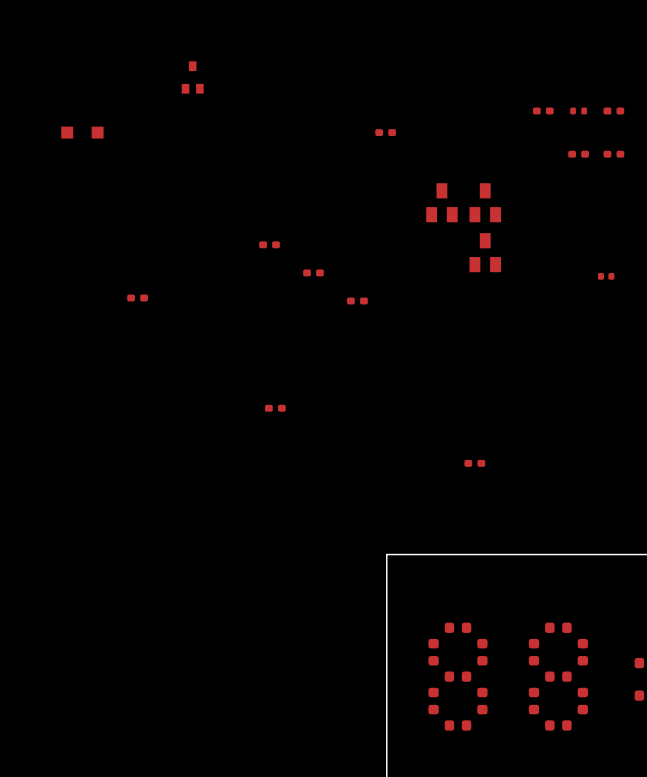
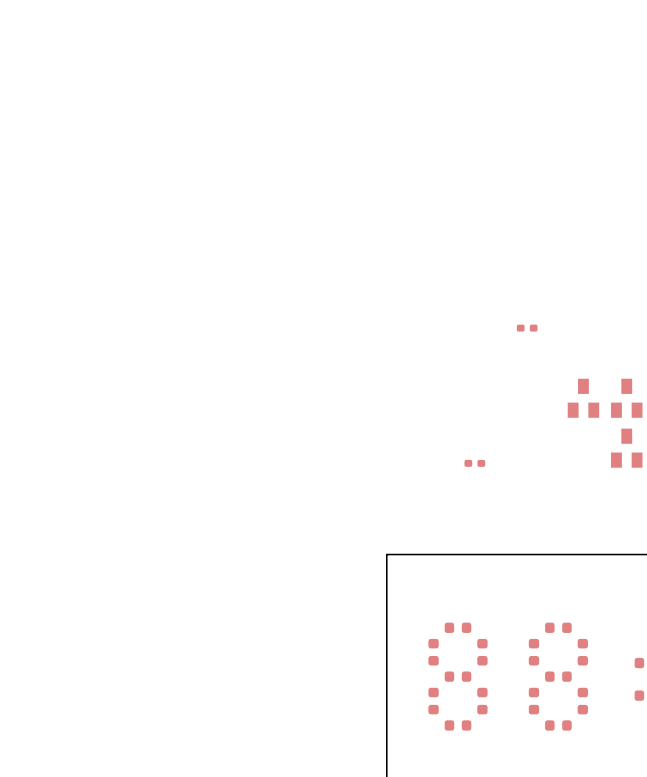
part: (192, 77) -> none
part: (543, 110) -> none
part: (578, 110) -> none
part: (613, 110) -> none
part: (82, 132) -> none
part: (385, 132) -> none
part: (578, 154) -> none
part: (613, 154) -> none
part: (441, 202) -> none
part: (485, 202) -> none
part: (269, 244) -> none
part: (485, 252) -> none
part: (313, 272) -> none
part: (606, 276) -> none
part: (137, 297) -> none
part: (357, 301) -> none
part: none -> (527, 328)
part: none -> (583, 398)
part: none -> (626, 398)
part: (275, 408) -> none
part: none -> (626, 448)

